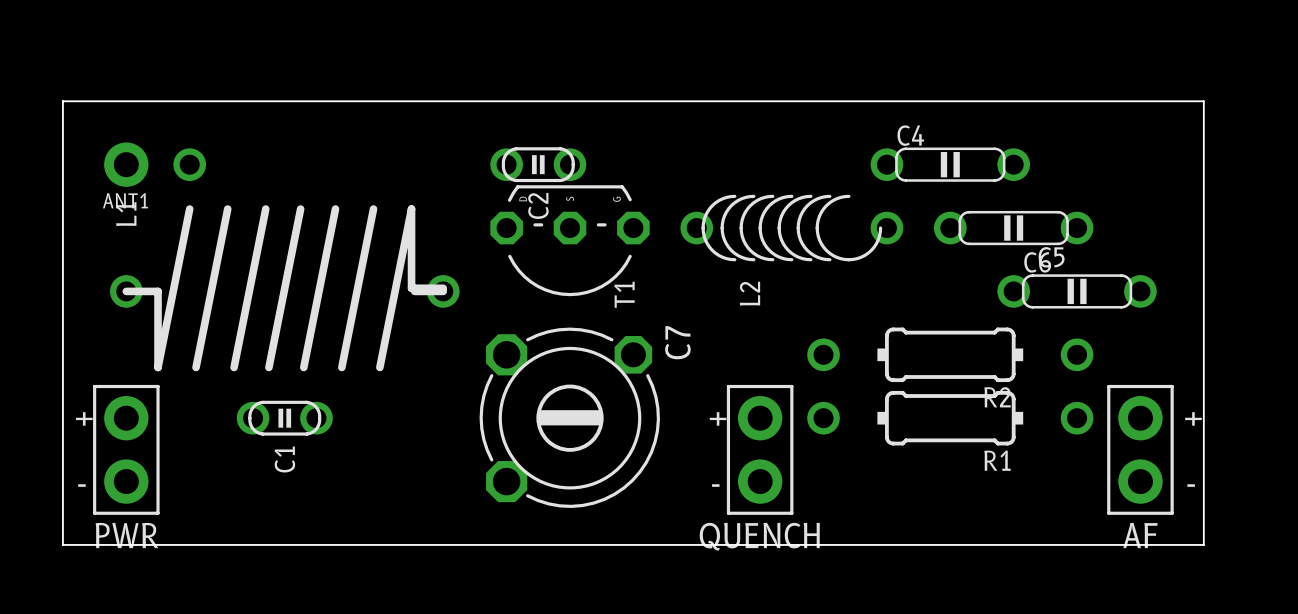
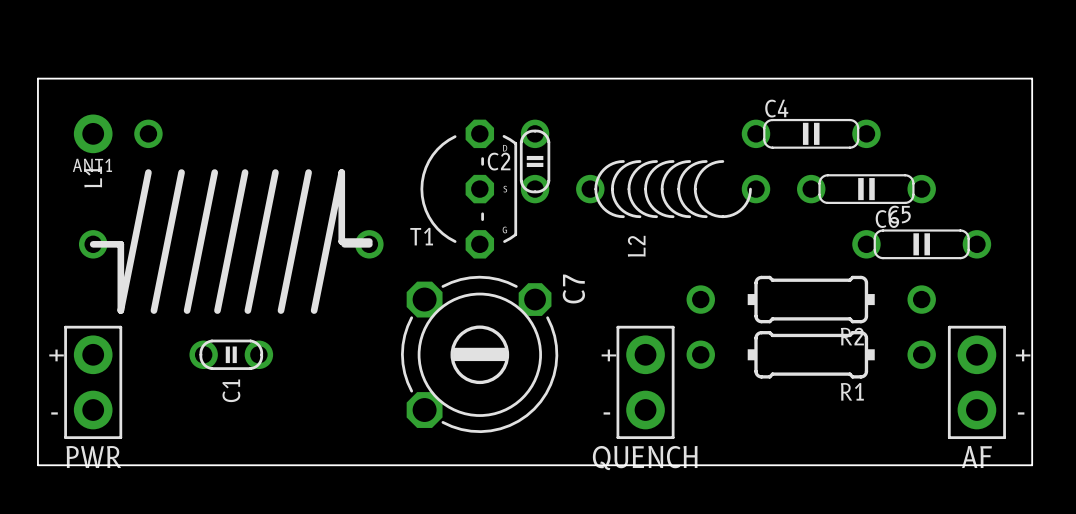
C2 rotation: 0° (538, 164) -> 90° clockwise (535, 161)
C2 position: (538, 164) -> (535, 161)
T1 rotation: 0° (570, 240) -> 90° clockwise (468, 189)

